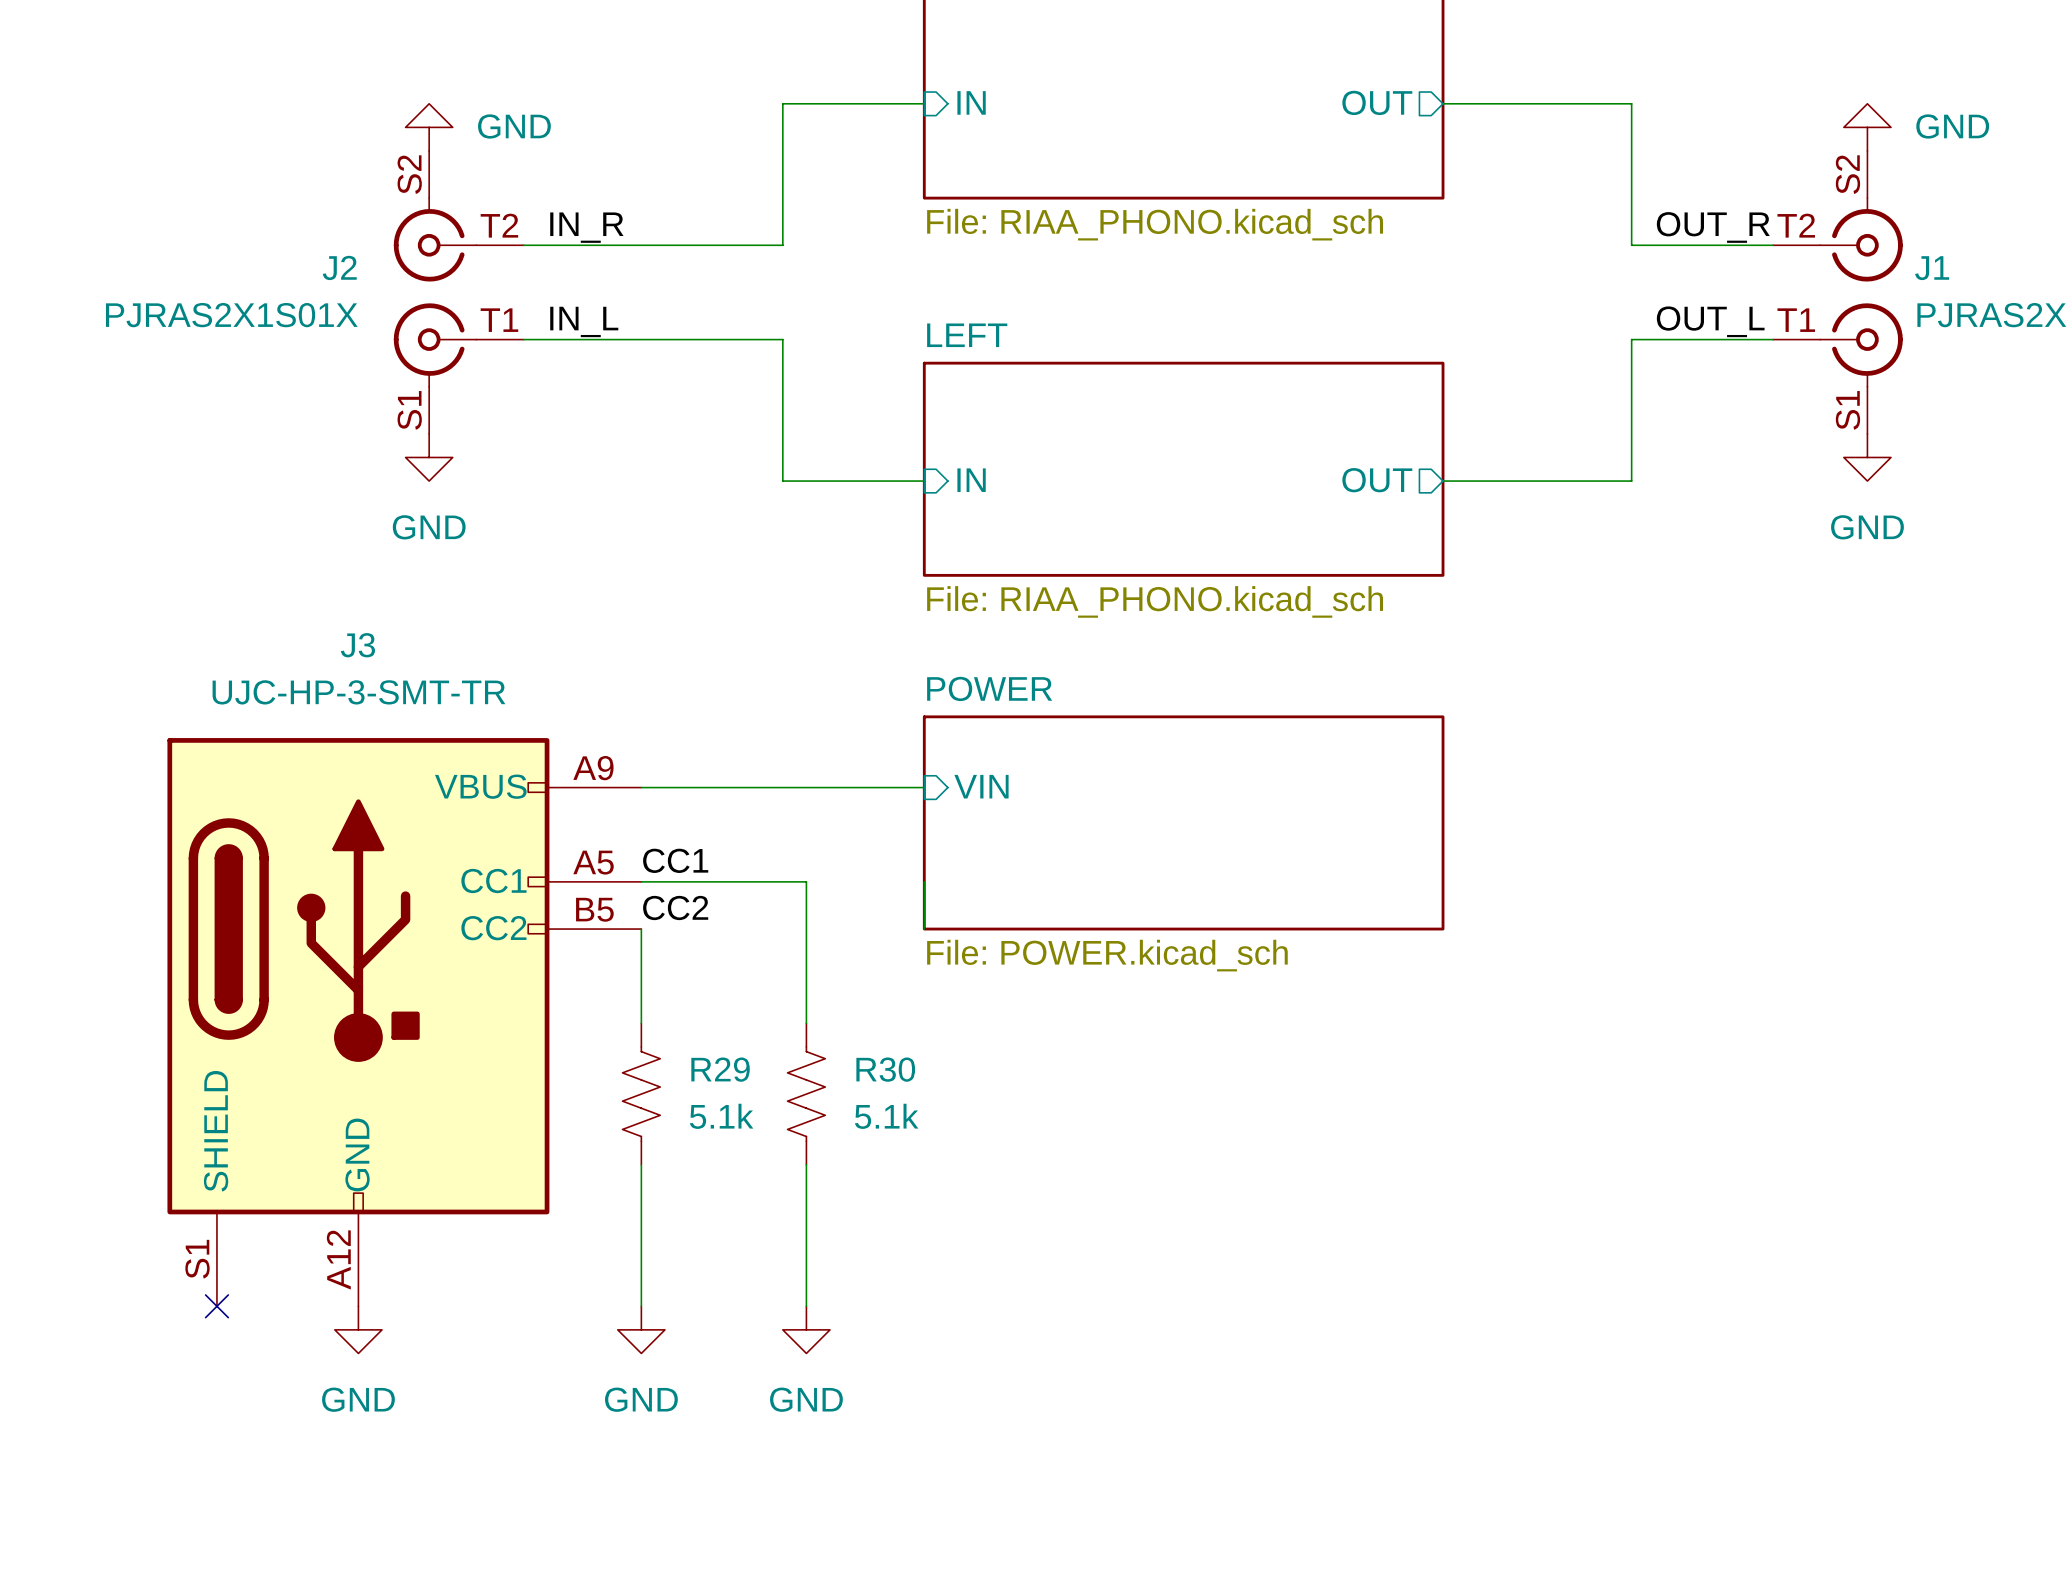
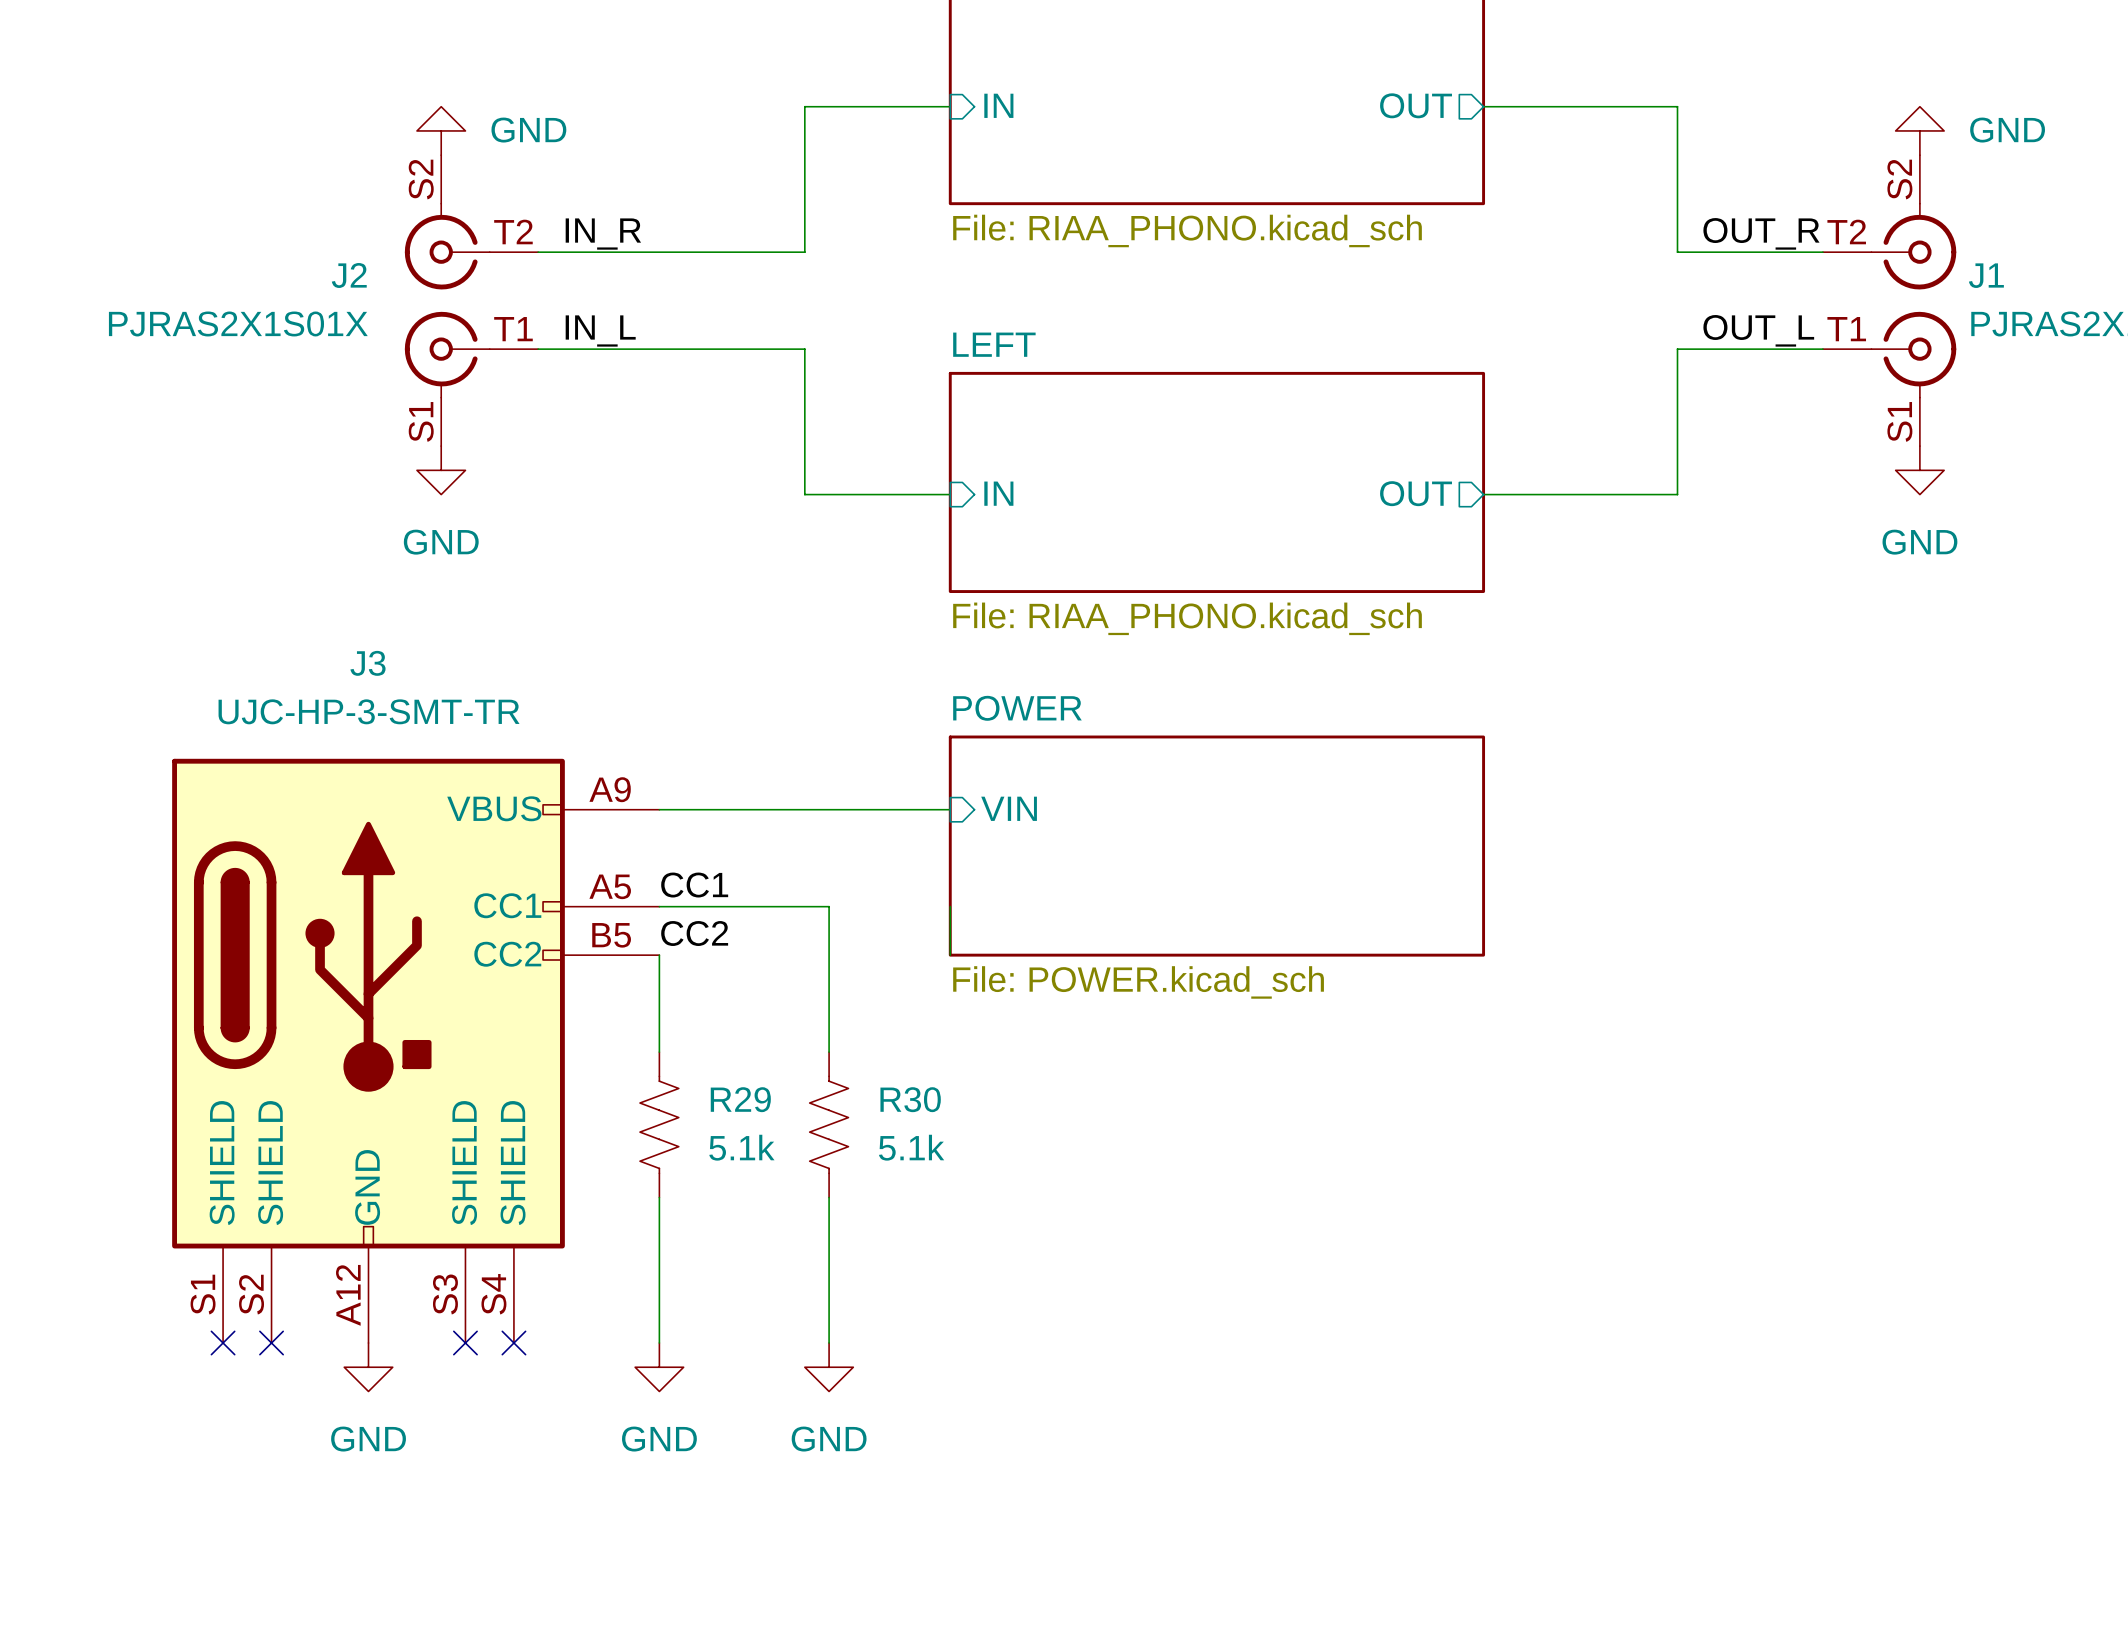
J3 symbol: [167, 738, 642, 1307] -> [172, 758, 660, 1344]
no-connect mark: none -> (271, 1343)
no-connect mark: none -> (465, 1343)
no-connect mark: none -> (513, 1343)

